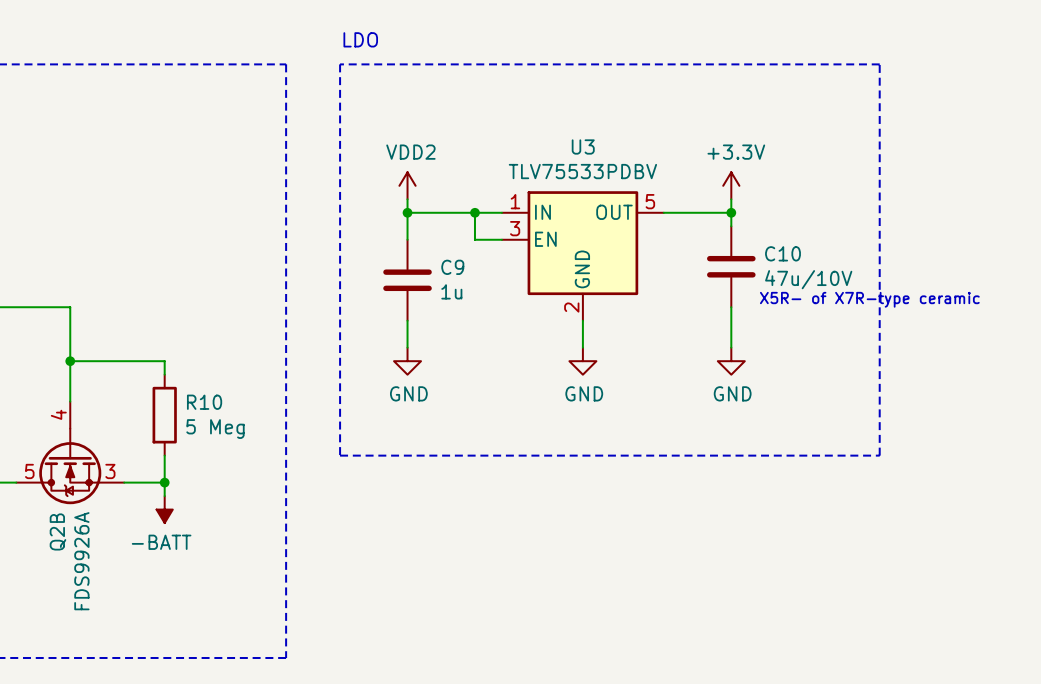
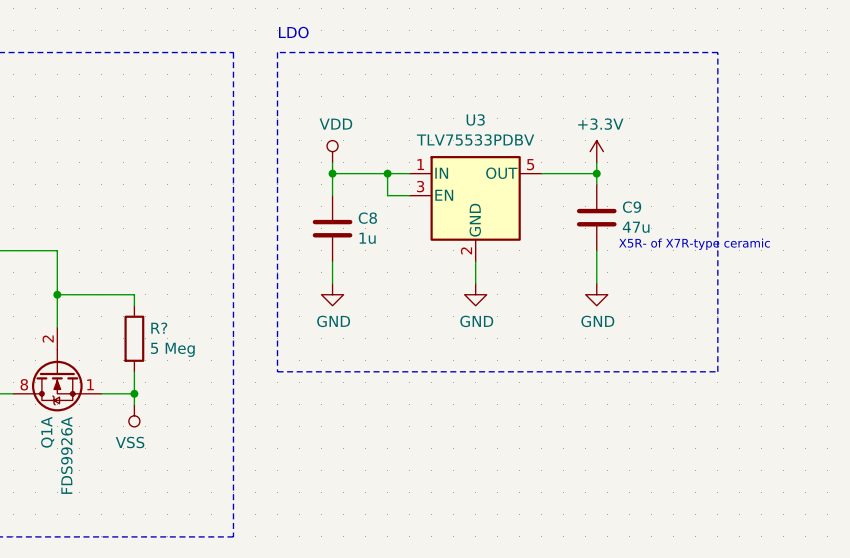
power symbol: VDD2 (407, 185) -> VDD (332, 151)
C10 name: C10 (783, 253) -> C9 (632, 207)
C9 name: C9 (452, 267) -> C8 (367, 218)
C10 value: 47u/10V (808, 279) -> 47u (636, 227)
R10 name: R10 (204, 402) -> R? (159, 328)
Q2B pin number: 4 (58, 414) -> 2 (48, 338)
Q2B pin number: 5 (29, 471) -> 8 (24, 384)
Q2B pin number: 3 (110, 471) -> 1 (90, 384)
power symbol: -BATT (164, 509) -> VSS (134, 415)
Q2B name: Q2B (57, 531) -> Q1A (47, 432)

